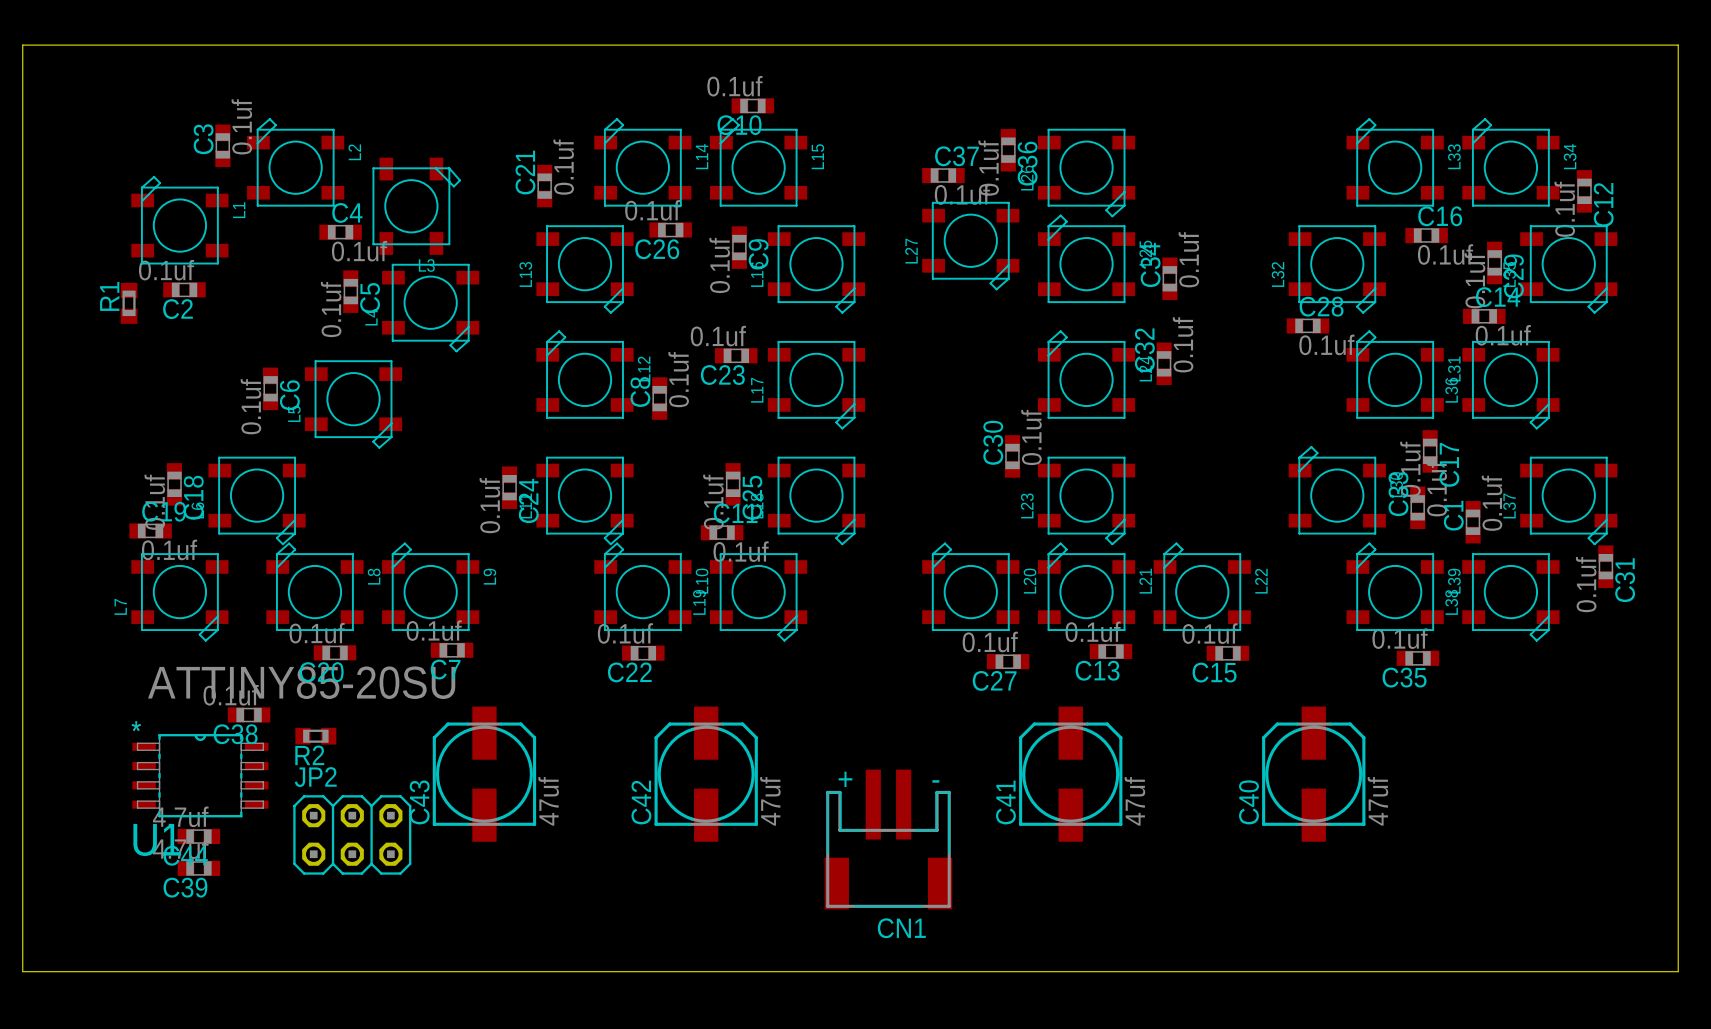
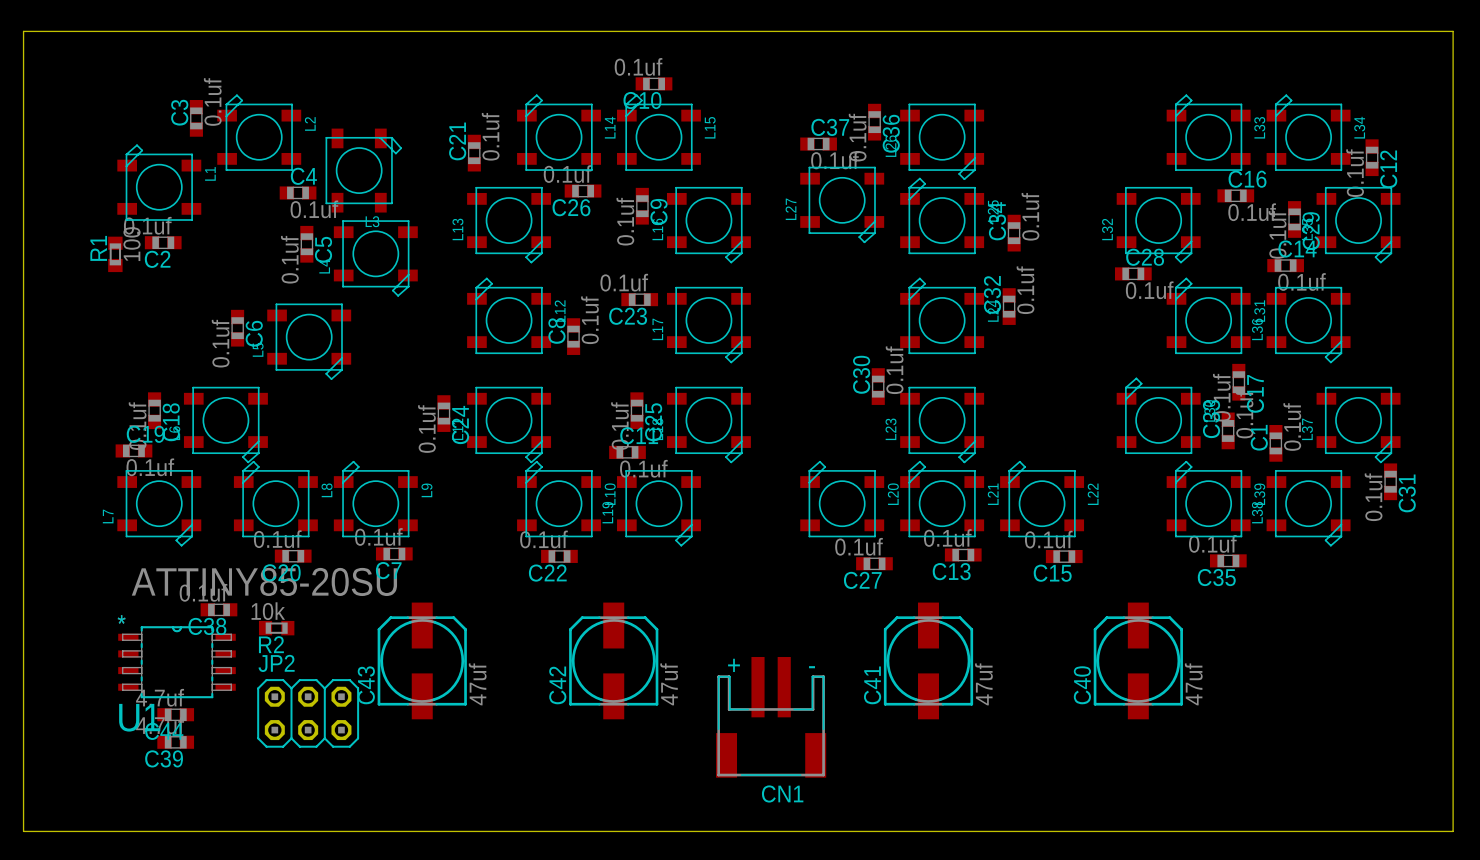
R1 value: none -> 100 (132, 244)
R2 value: none -> 10k (268, 611)

